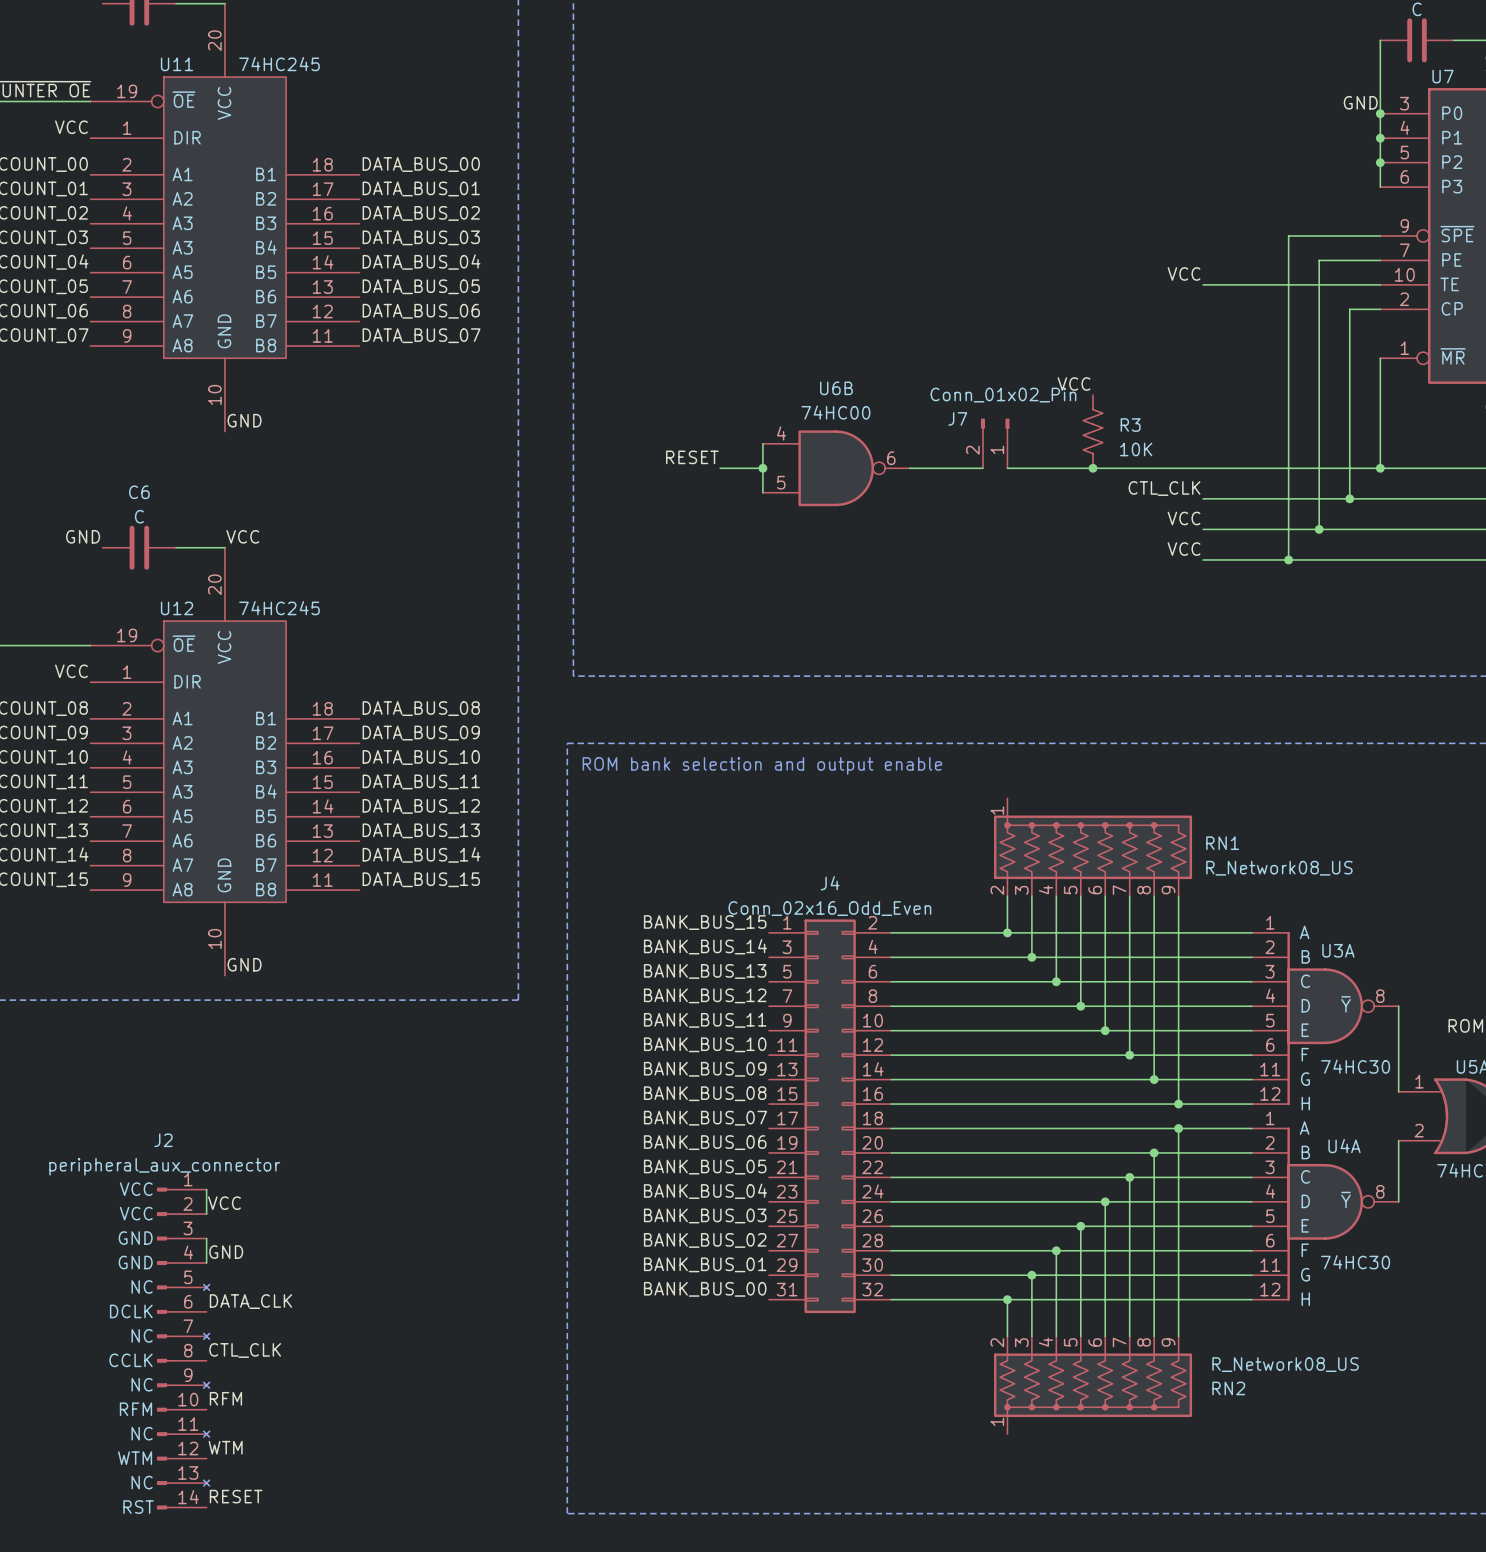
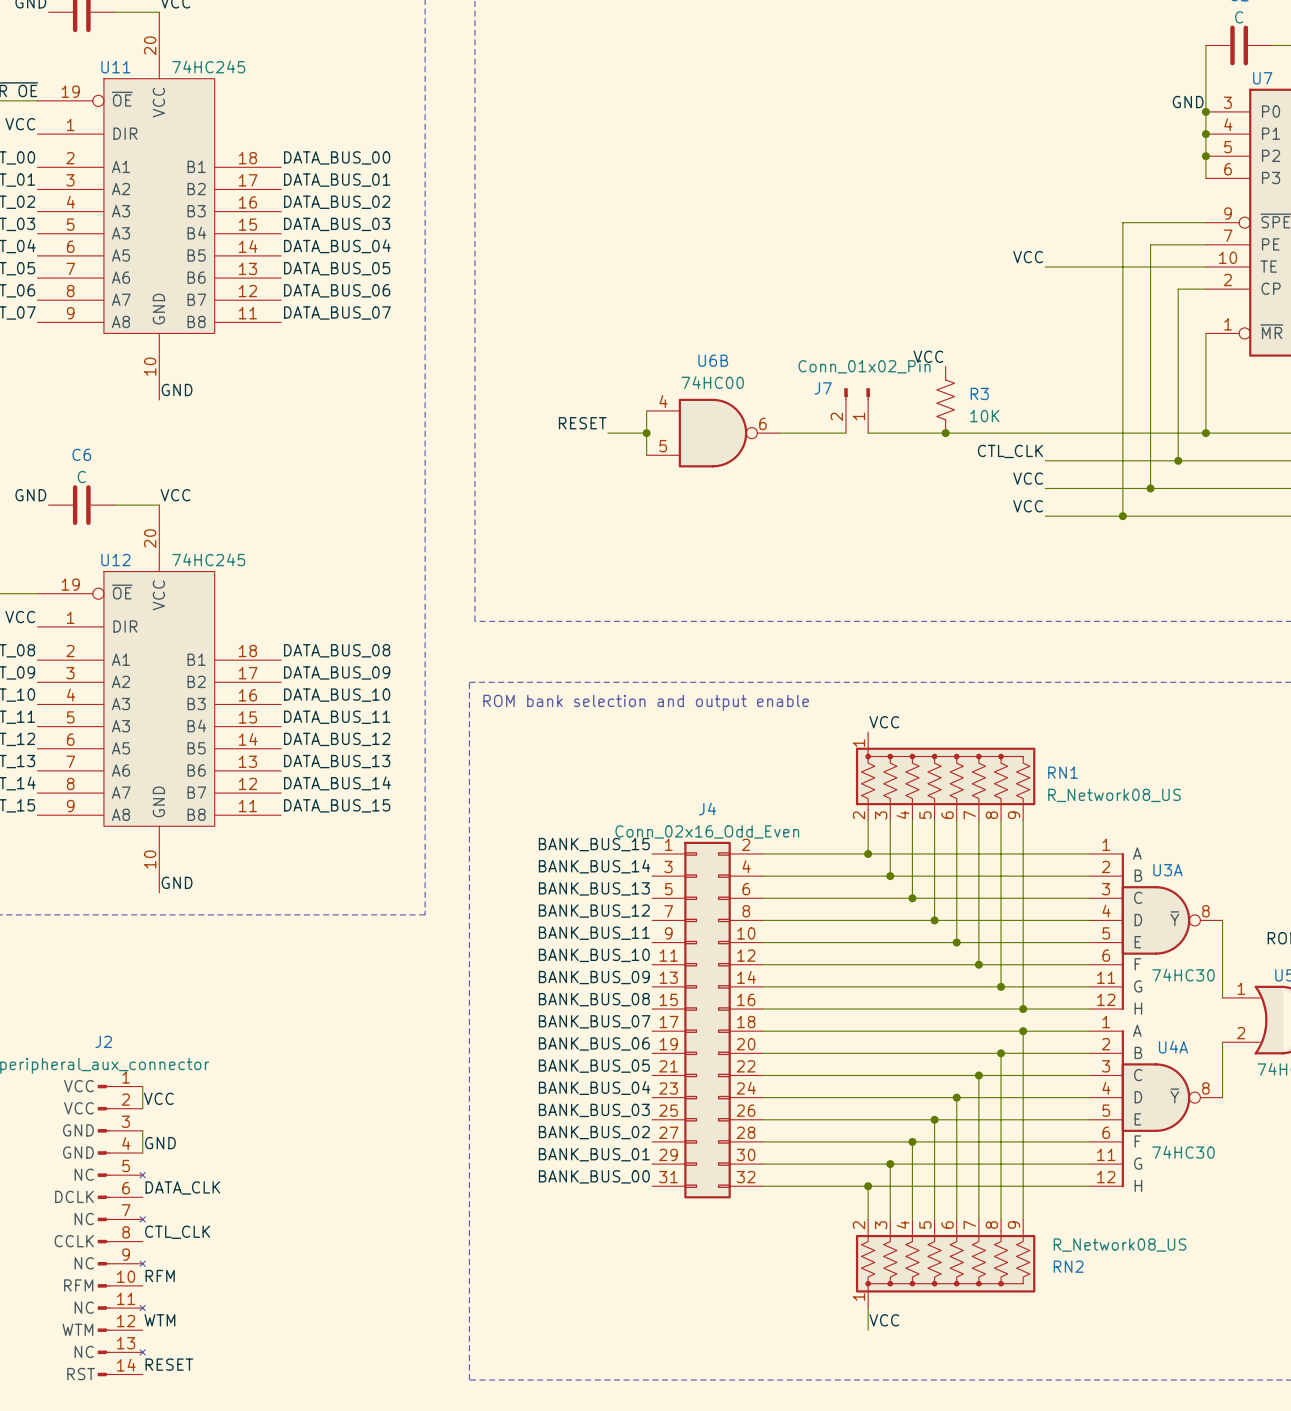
label: none -> VCC (884, 722)
wire: none -> (868, 1308) (868, 1330)
label: none -> VCC (884, 1320)

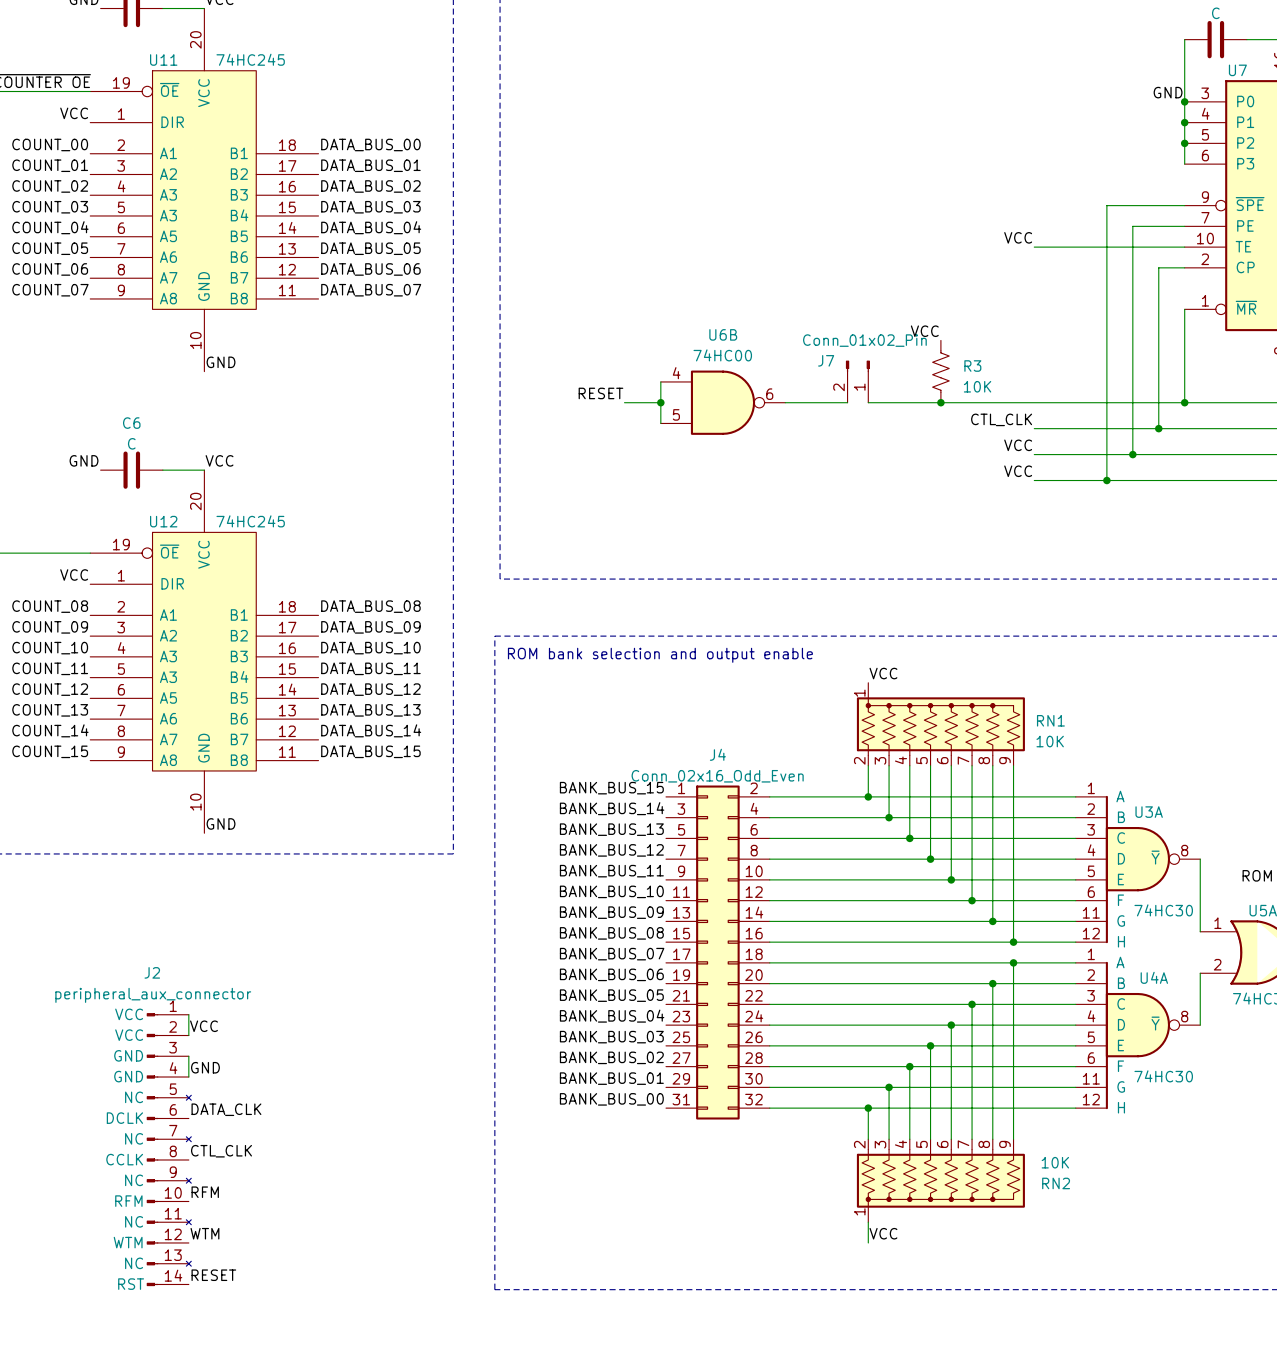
RN1 value: R_Network08_US (1114, 795) -> 10K (1050, 741)
RN2 value: R_Network08_US (1120, 1245) -> 10K (1055, 1162)

